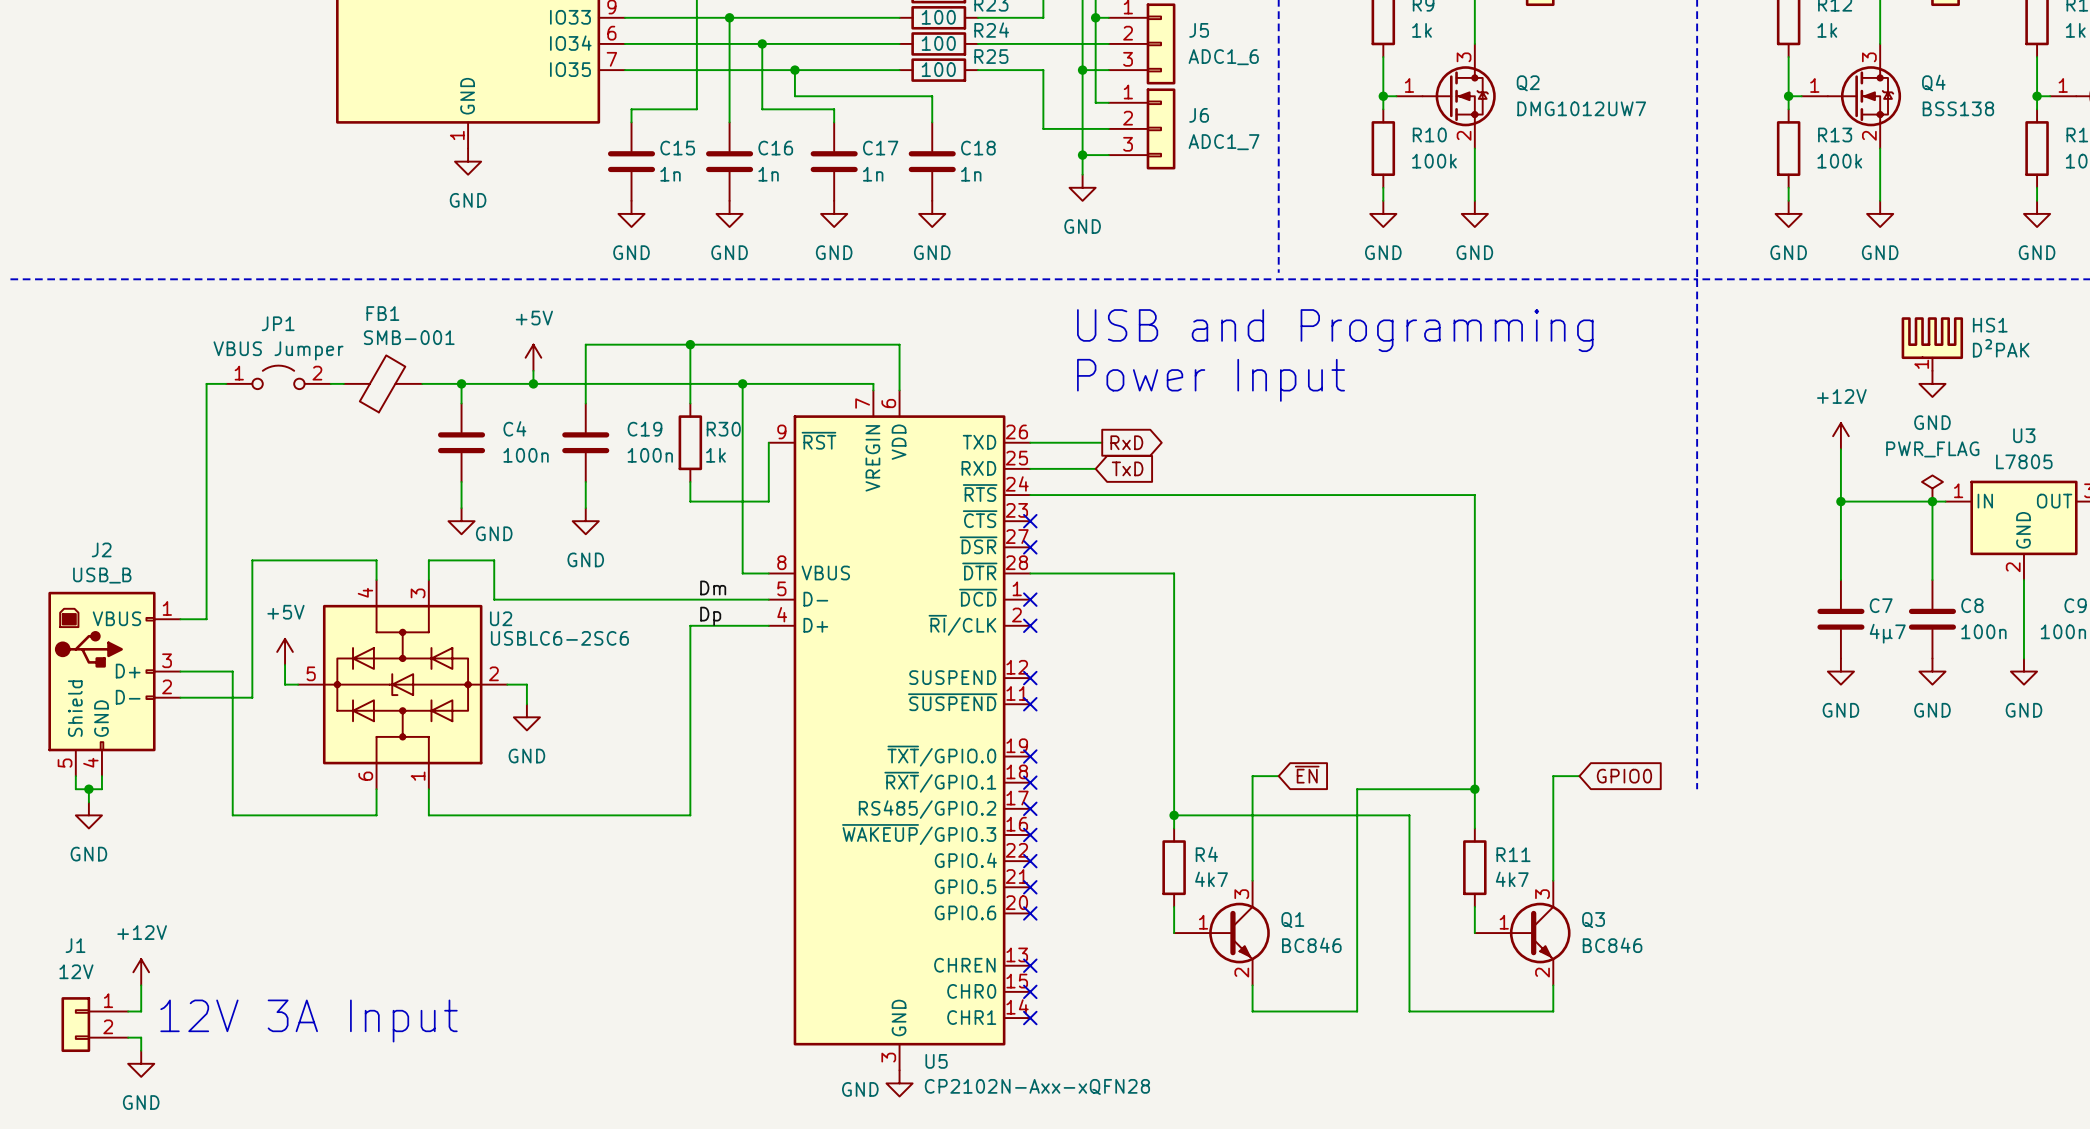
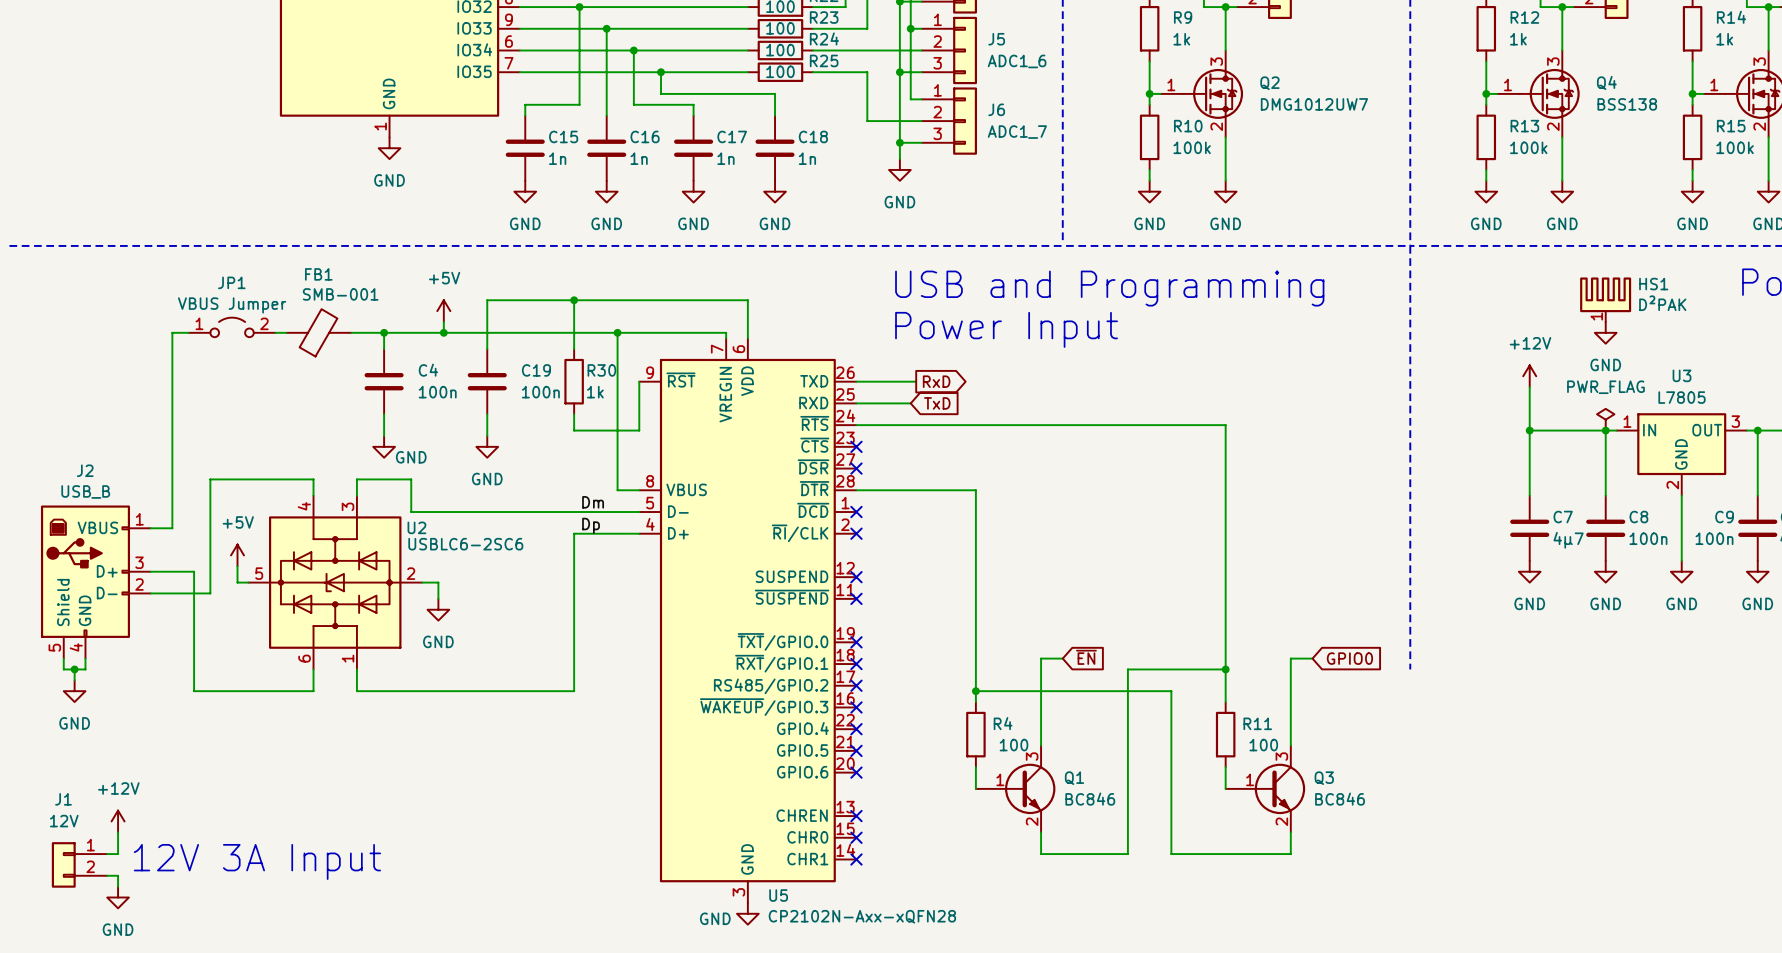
R4 value: 4k7 (1211, 879) -> 100 (1014, 745)
R11 value: 4k7 (1512, 879) -> 100 (1263, 745)

